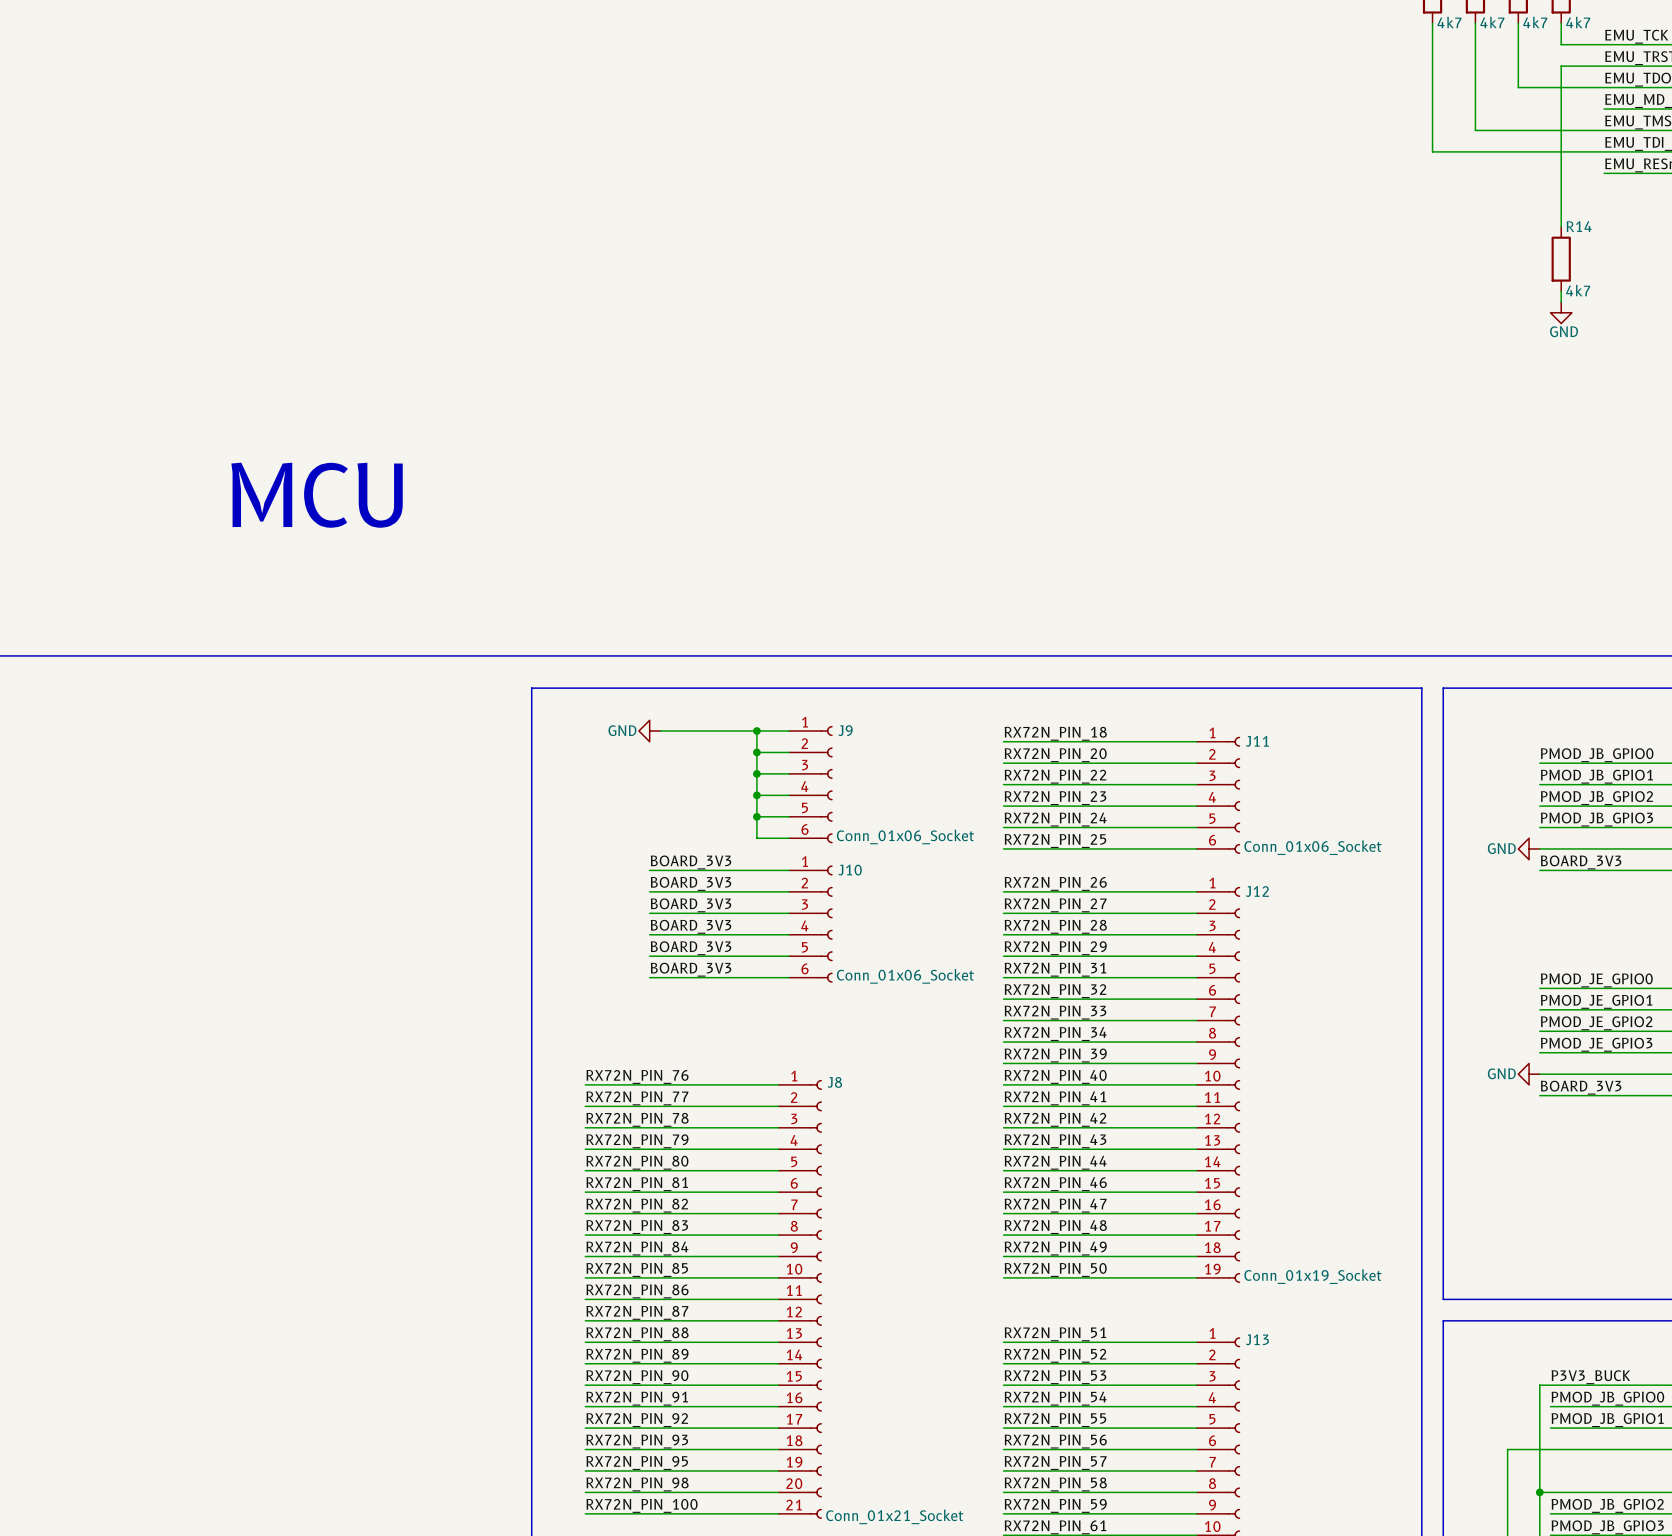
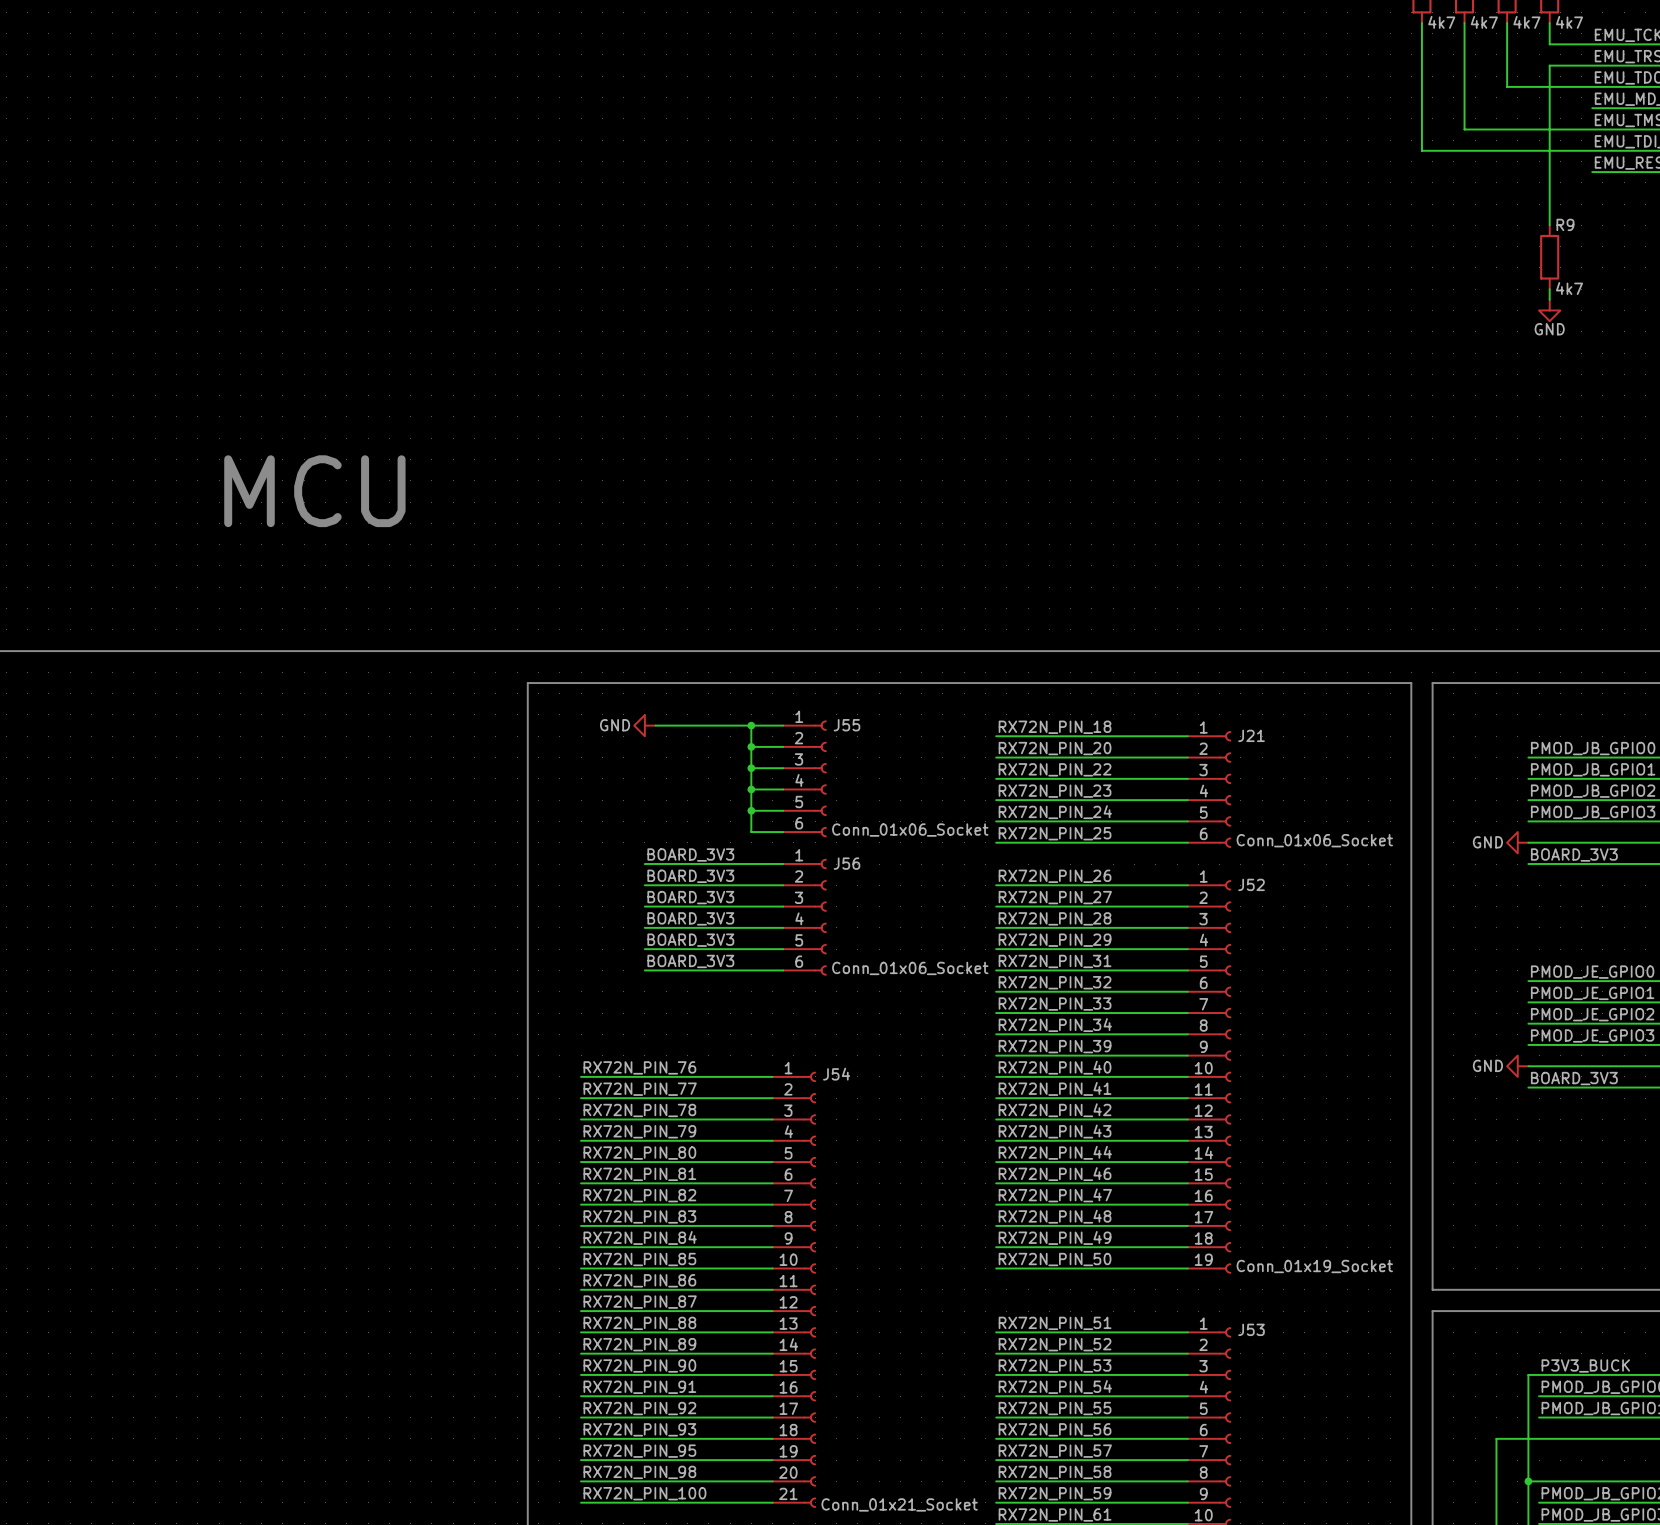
R14 name: R14 (1579, 226) -> R9 (1565, 224)
J9 name: J9 (845, 730) -> J55 (847, 725)
J11 name: J11 (1257, 741) -> J21 (1251, 735)
J10 name: J10 (850, 870) -> J56 (847, 863)
J12 name: J12 (1257, 891) -> J52 (1251, 884)
J8 name: J8 (834, 1082) -> J54 (836, 1074)
J13 name: J13 (1257, 1339) -> J53 (1251, 1329)

